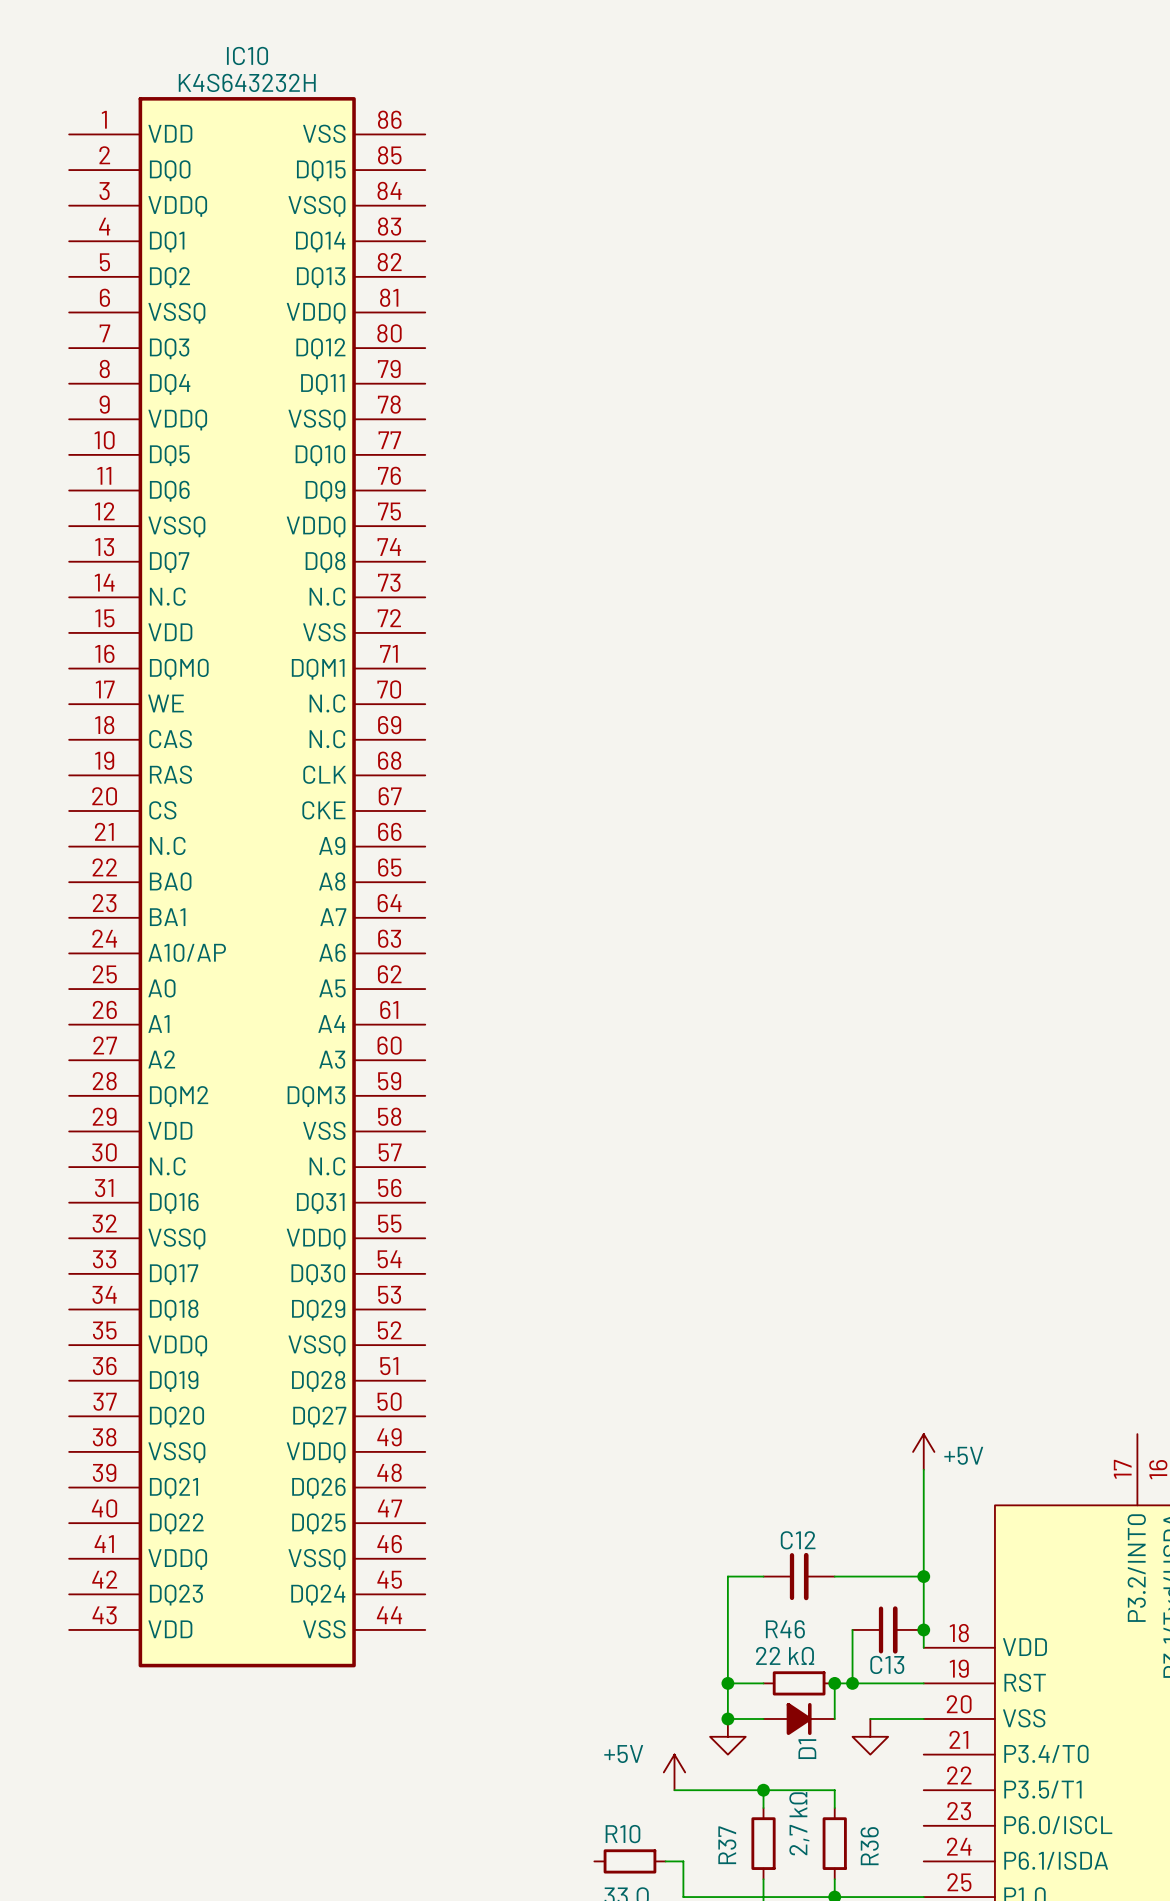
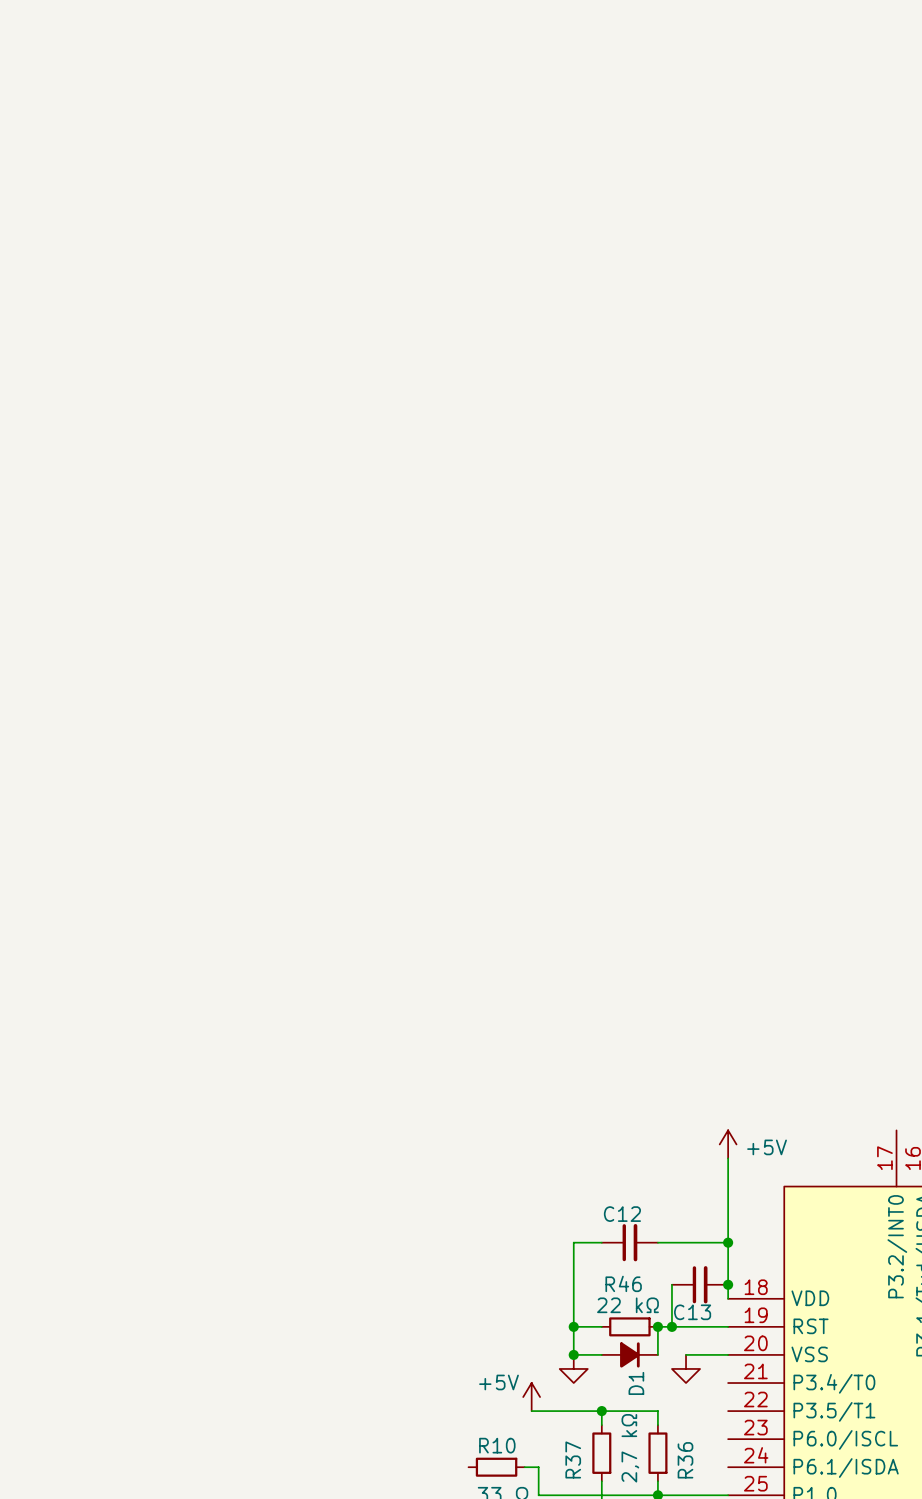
IC10: K4S643232H (247, 882) -> none

